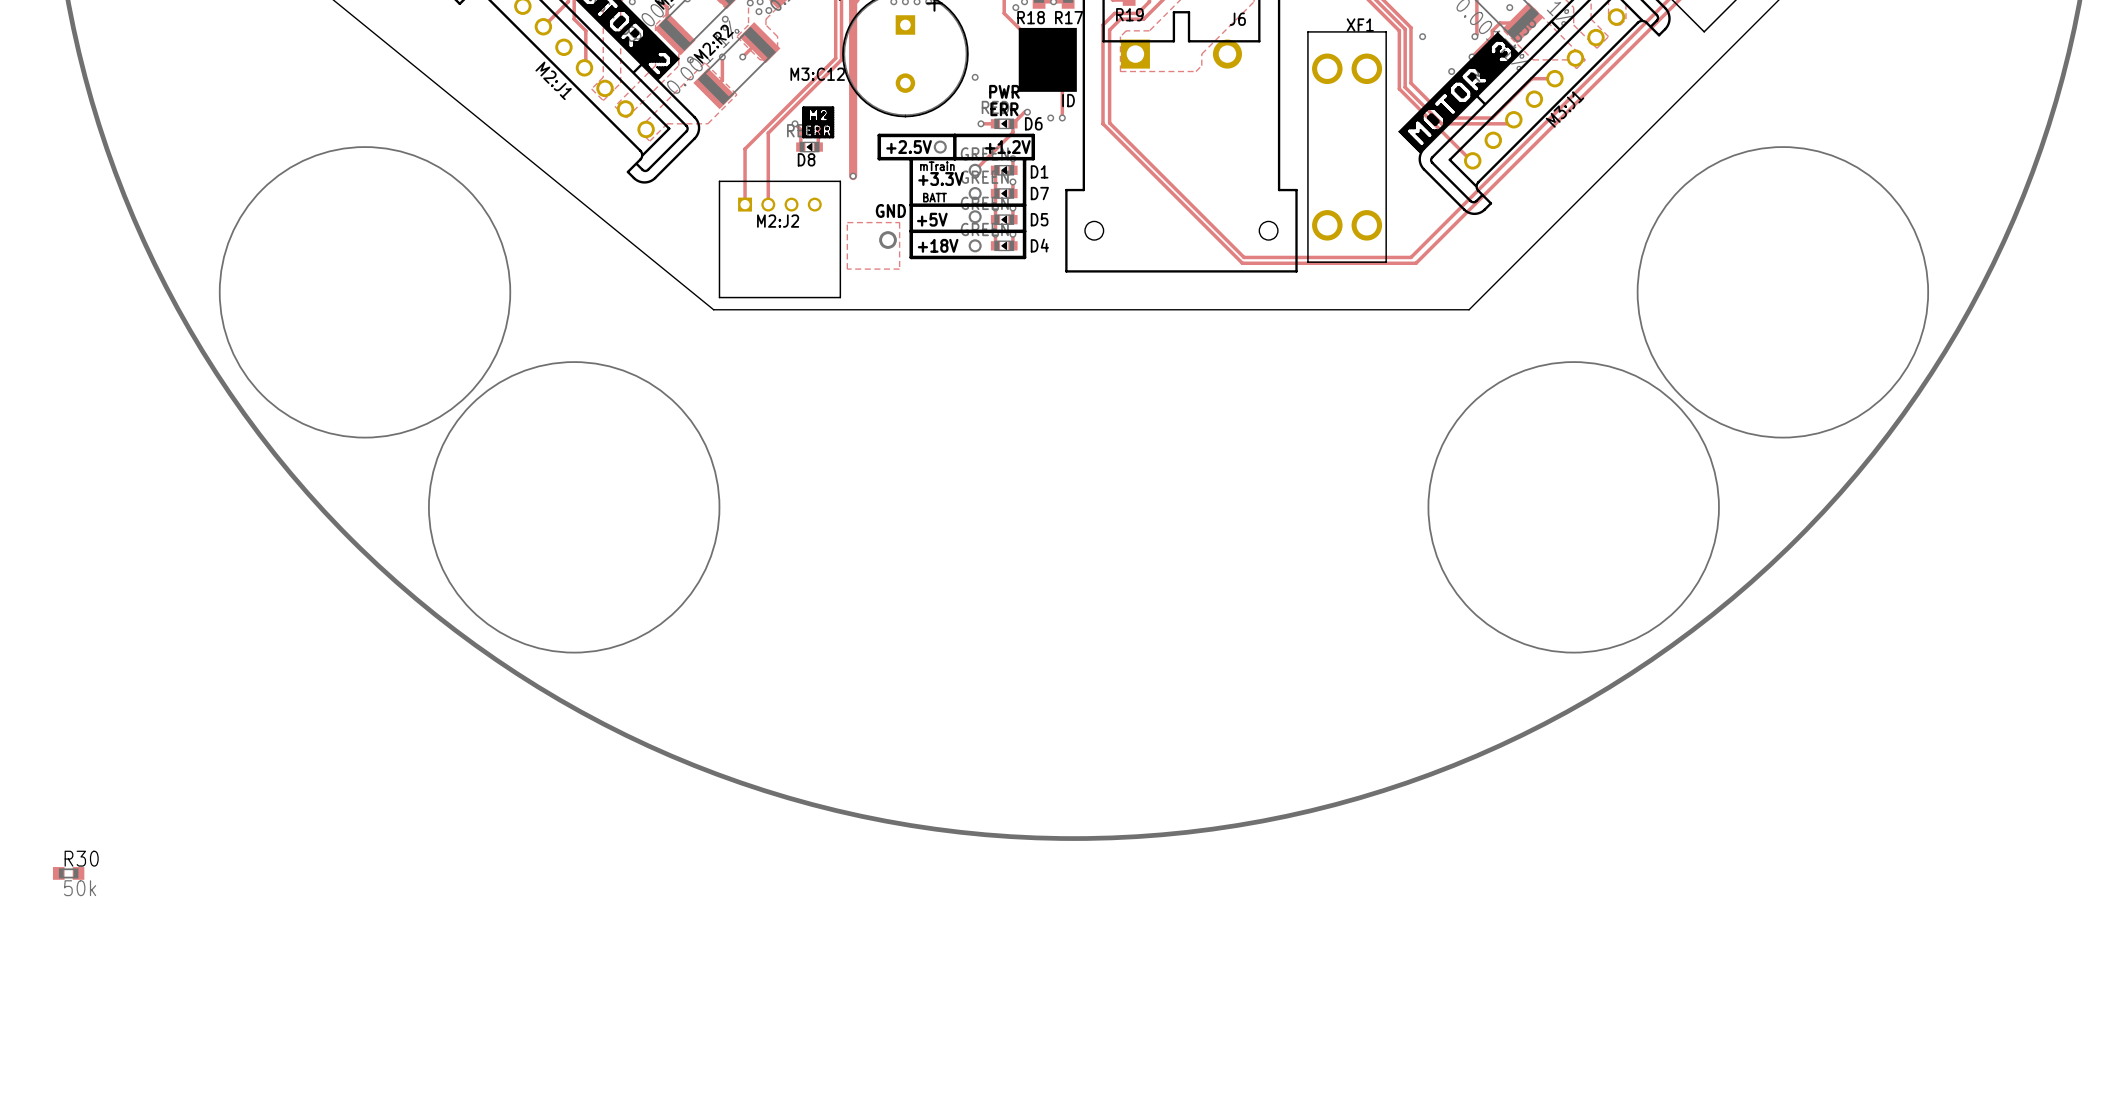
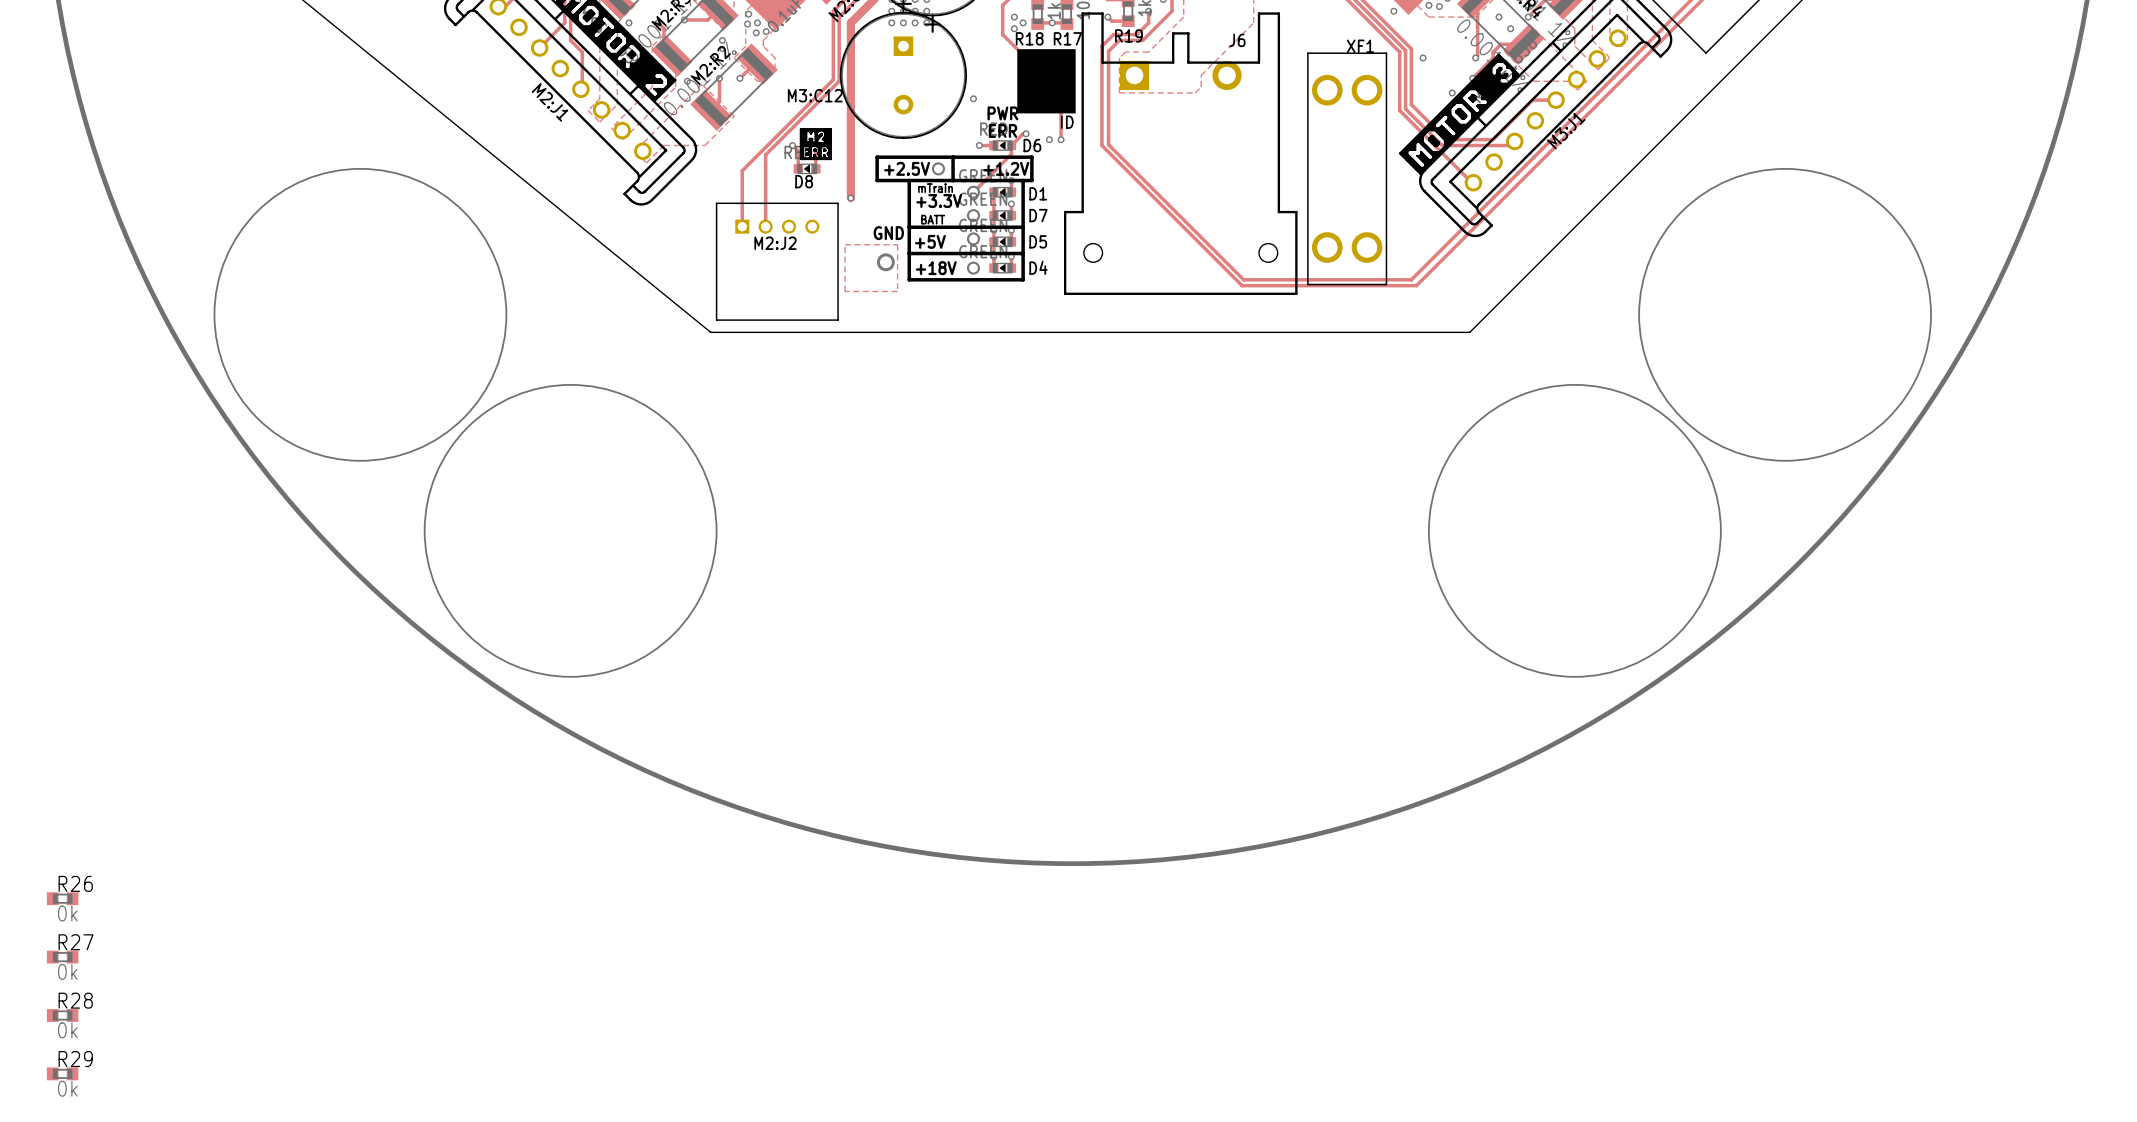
R30 name: R30 (81, 858) -> R26 (75, 883)
R30 value: 50k (80, 888) -> 0k (67, 913)
R27: none -> 0k (62, 957)
R28: none -> 0k (62, 1015)
R29: none -> 0k (62, 1073)

